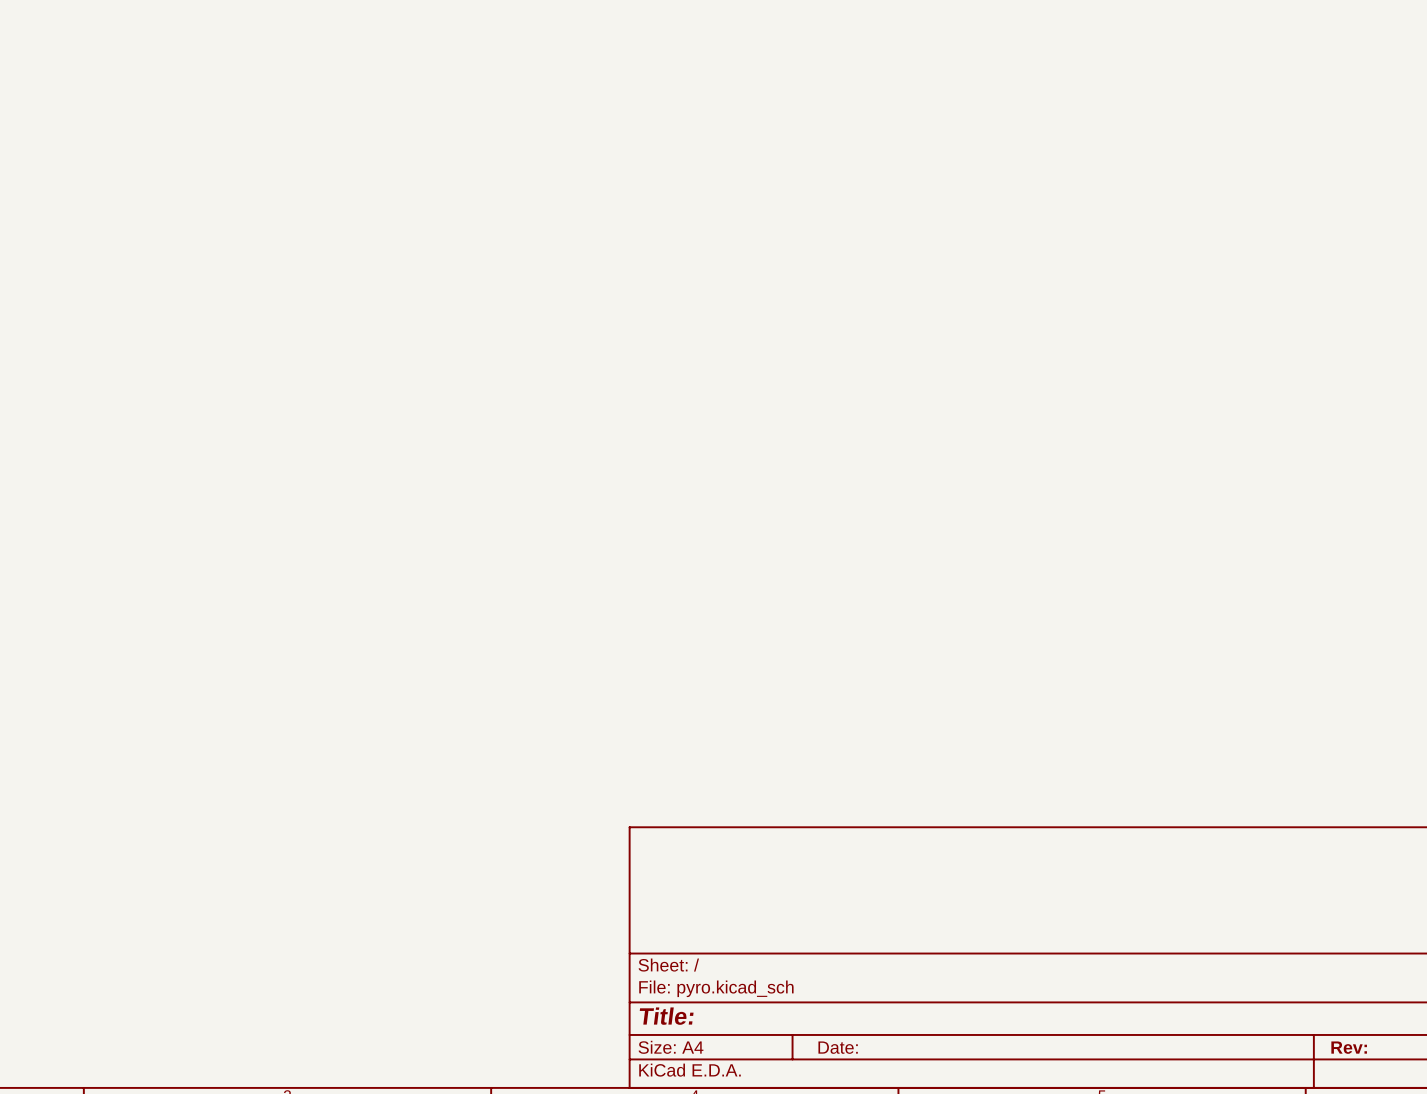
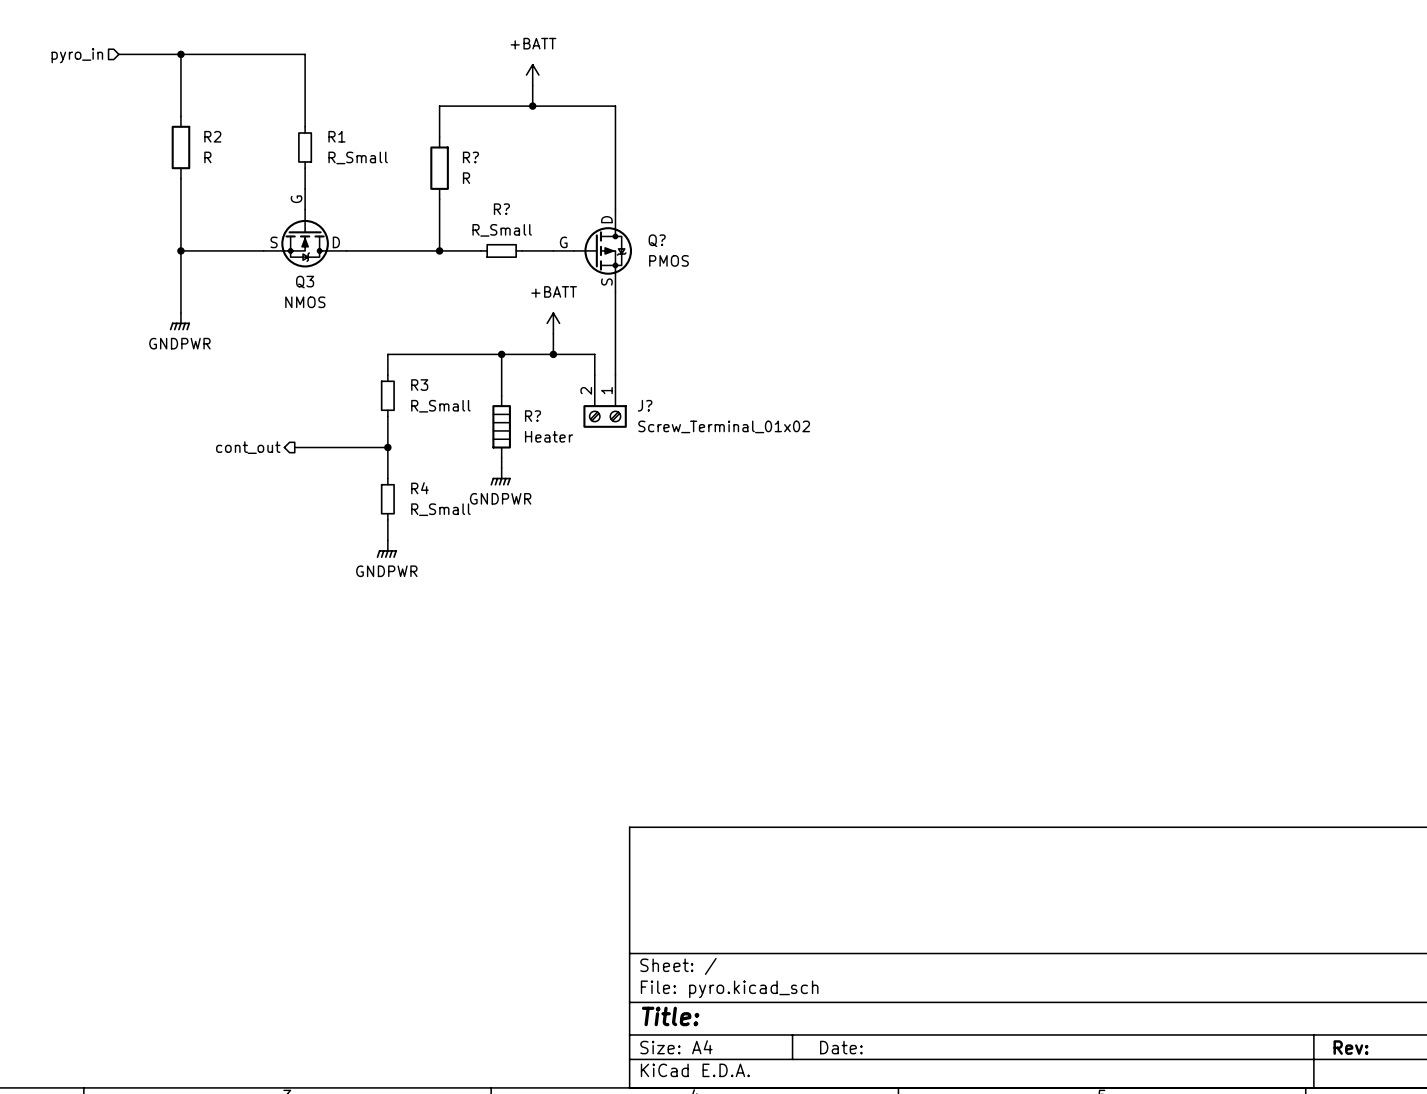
wire: none -> (118, 54) (305, 54) (305, 126)
wire: none -> (180, 54) (180, 116)
junction: none -> (180, 54)
hierarchical label: none -> pyro_in (77, 55)
power symbol: none -> +BATT (532, 75)
wire: none -> (532, 85) (532, 106)
junction: none -> (532, 106)
wire: none -> (439, 137) (439, 106) (615, 106) (615, 209)
R2: none -> R (180, 147)
R1: none -> R_Small (305, 147)
wire: none -> (305, 168) (305, 188)
R?: none -> R (439, 168)
wire: none -> (180, 178) (180, 313)
wire: none -> (439, 199) (439, 250)
Q3: none -> NMOS (305, 228)
wire: none -> (180, 250) (263, 250)
junction: none -> (180, 250)
wire: none -> (346, 250) (480, 250)
junction: none -> (439, 250)
R?: none -> R_Small (501, 250)
wire: none -> (522, 250) (553, 250)
Q?: none -> PMOS (592, 250)
wire: none -> (615, 292) (615, 375)
power symbol: none -> GNDPWR (179, 321)
power symbol: none -> +BATT (553, 323)
wire: none -> (553, 333) (553, 354)
wire: none -> (501, 354) (501, 395)
junction: none -> (501, 354)
junction: none -> (553, 354)
wire: none -> (387, 375) (387, 354) (594, 354) (594, 375)
R3: none -> R_Small (387, 395)
J?: none -> Screw_Terminal_01x02 (605, 401)
wire: none -> (387, 416) (387, 478)
R?: none -> Heater (501, 426)
wire: none -> (294, 447) (387, 447)
junction: none -> (387, 447)
hierarchical label: none -> cont_out (248, 447)
wire: none -> (501, 457) (501, 468)
power symbol: none -> GNDPWR (500, 476)
R4: none -> R_Small (387, 499)
wire: none -> (387, 519) (387, 540)
power symbol: none -> GNDPWR (386, 549)

